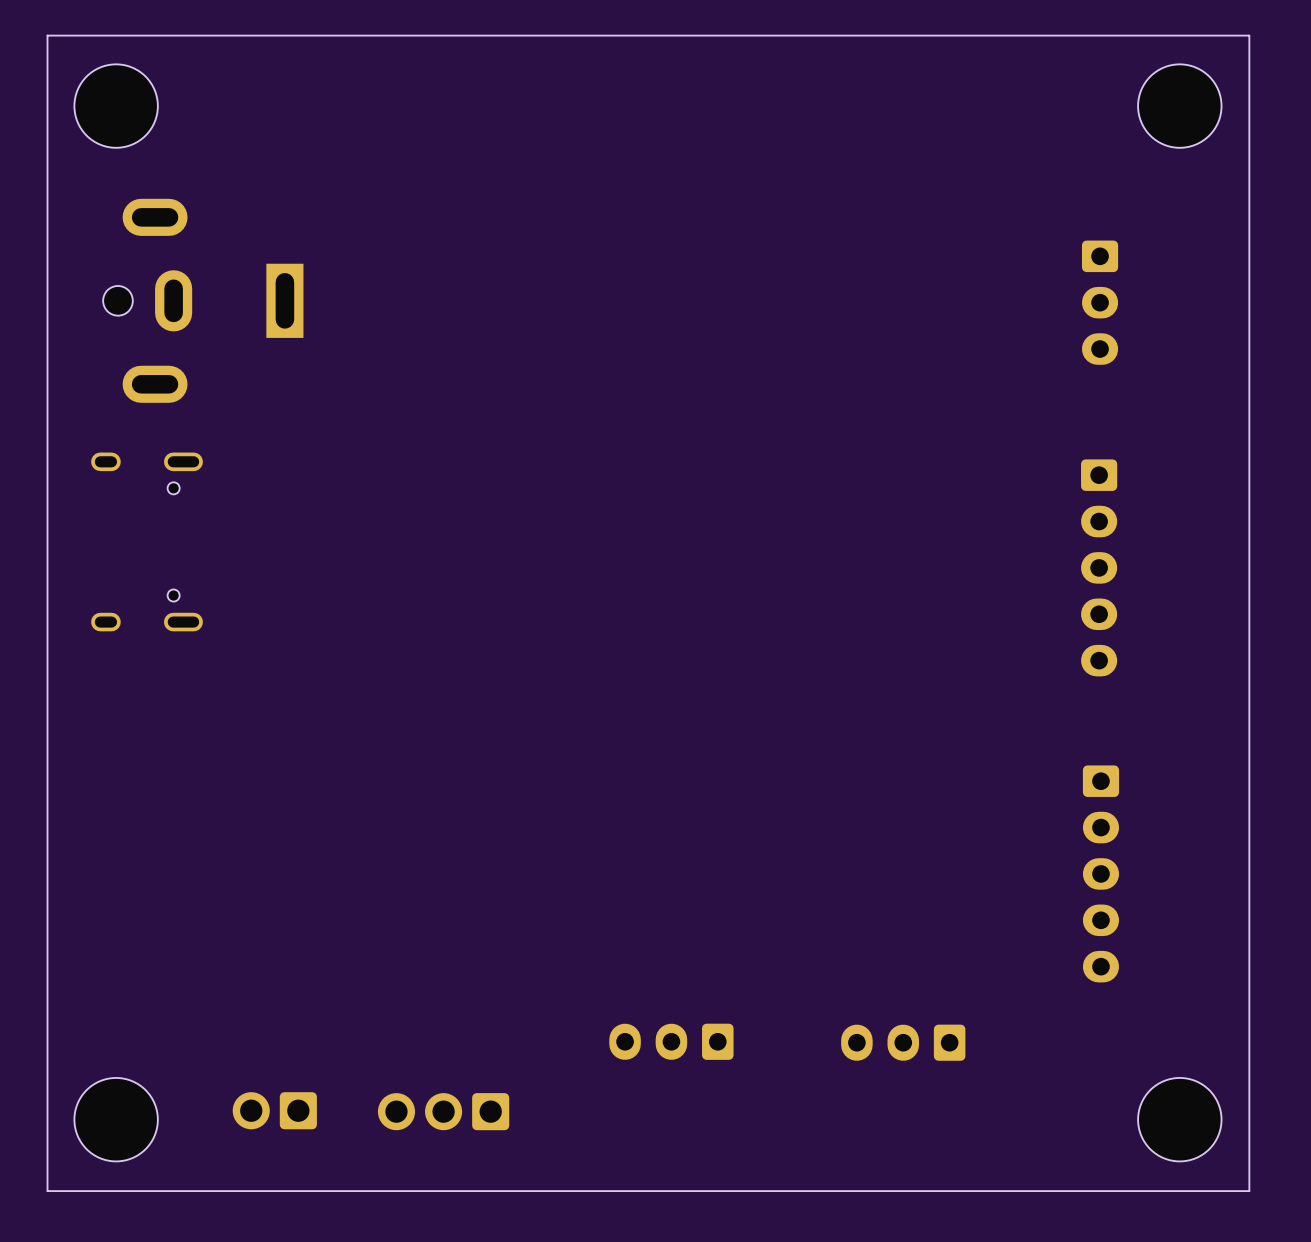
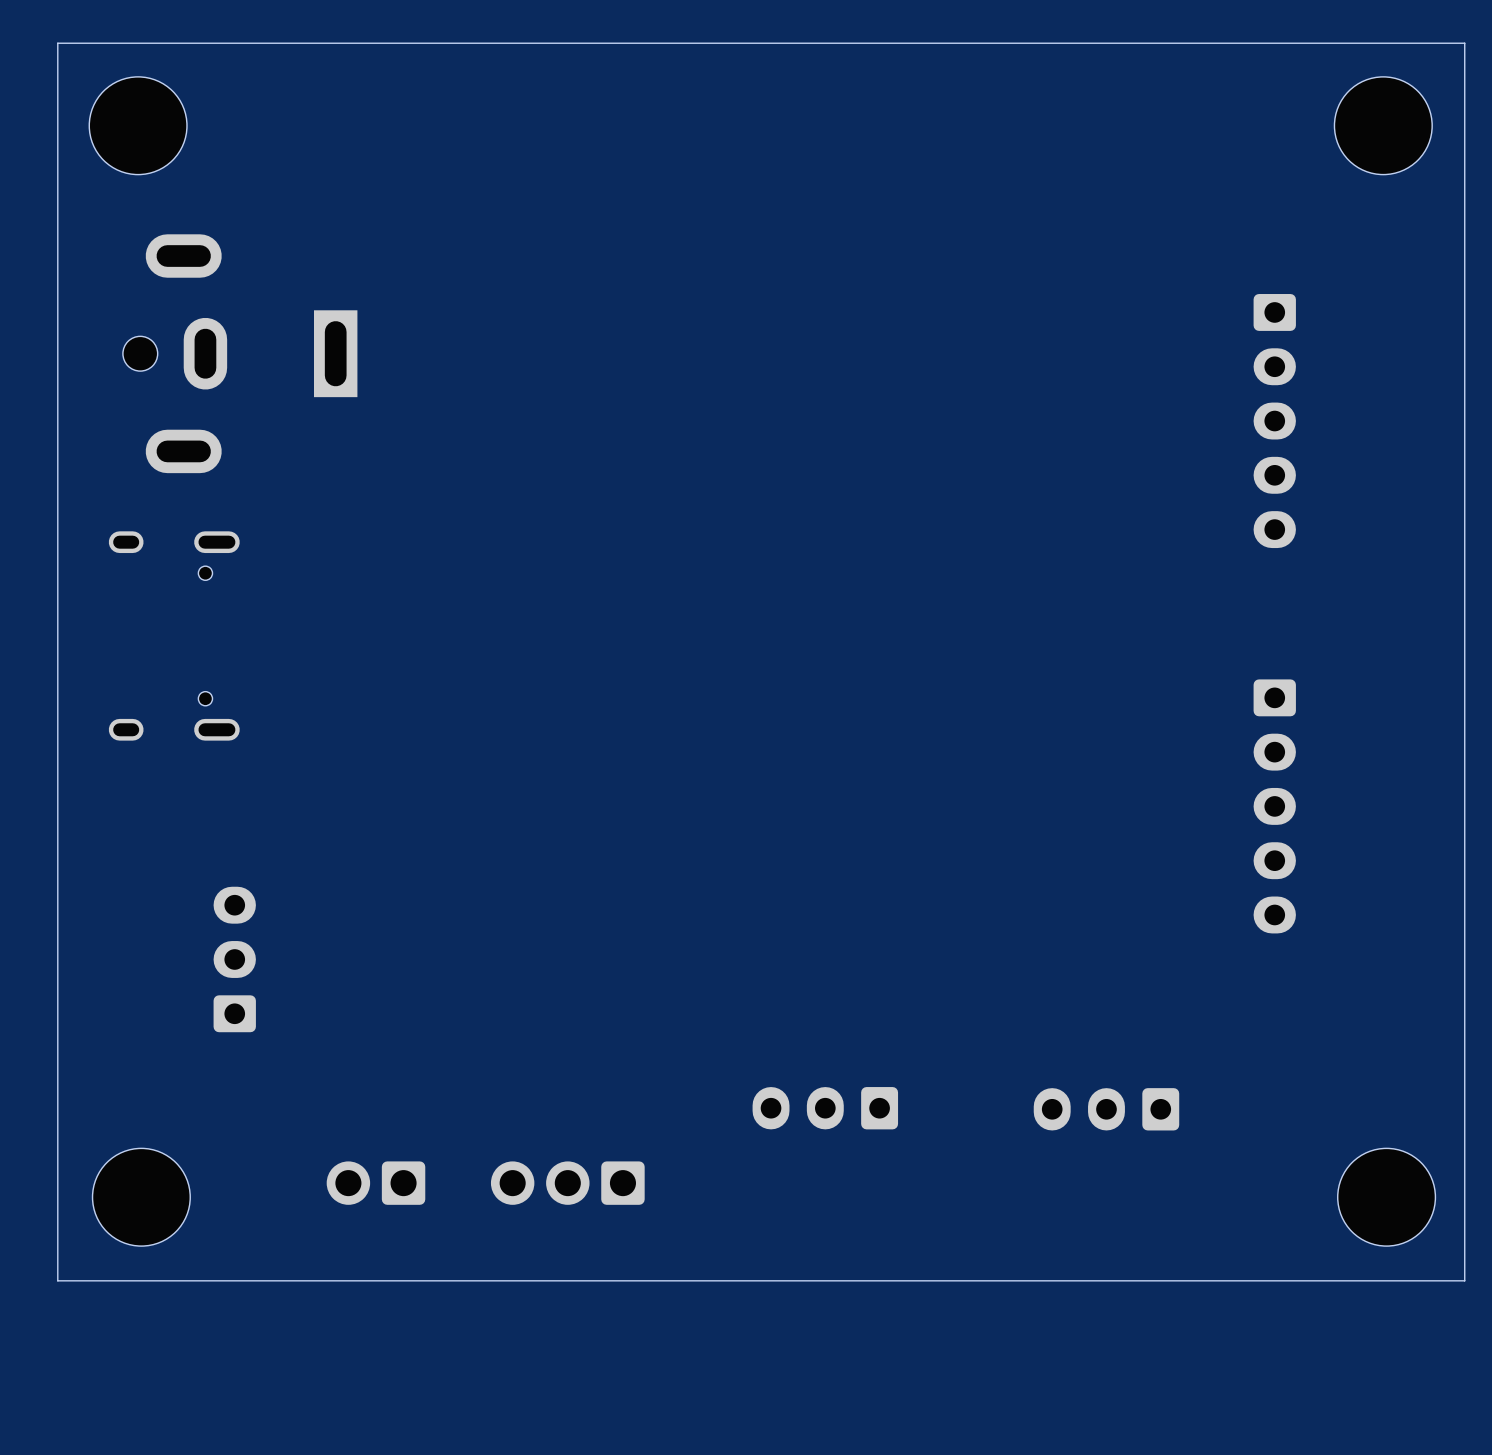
part: (1100, 302) -> none
part: none -> (1274, 421)
part: (1099, 567) -> none
part: none -> (1274, 806)
part: none -> (234, 959)
part: (1100, 873) -> none
part position: (671, 1041) -> (825, 1108)
part position: (903, 1042) -> (1106, 1109)
board edge: (1249, 1092) (1249, 1191) (47, 1191) (47, 1092) -> (1464, 1280) (57, 1280)
part position: (274, 1110) -> (375, 1183)
part position: (443, 1111) -> (567, 1183)
part position: (116, 1119) -> (141, 1197)
part position: (1179, 1119) -> (1386, 1197)

